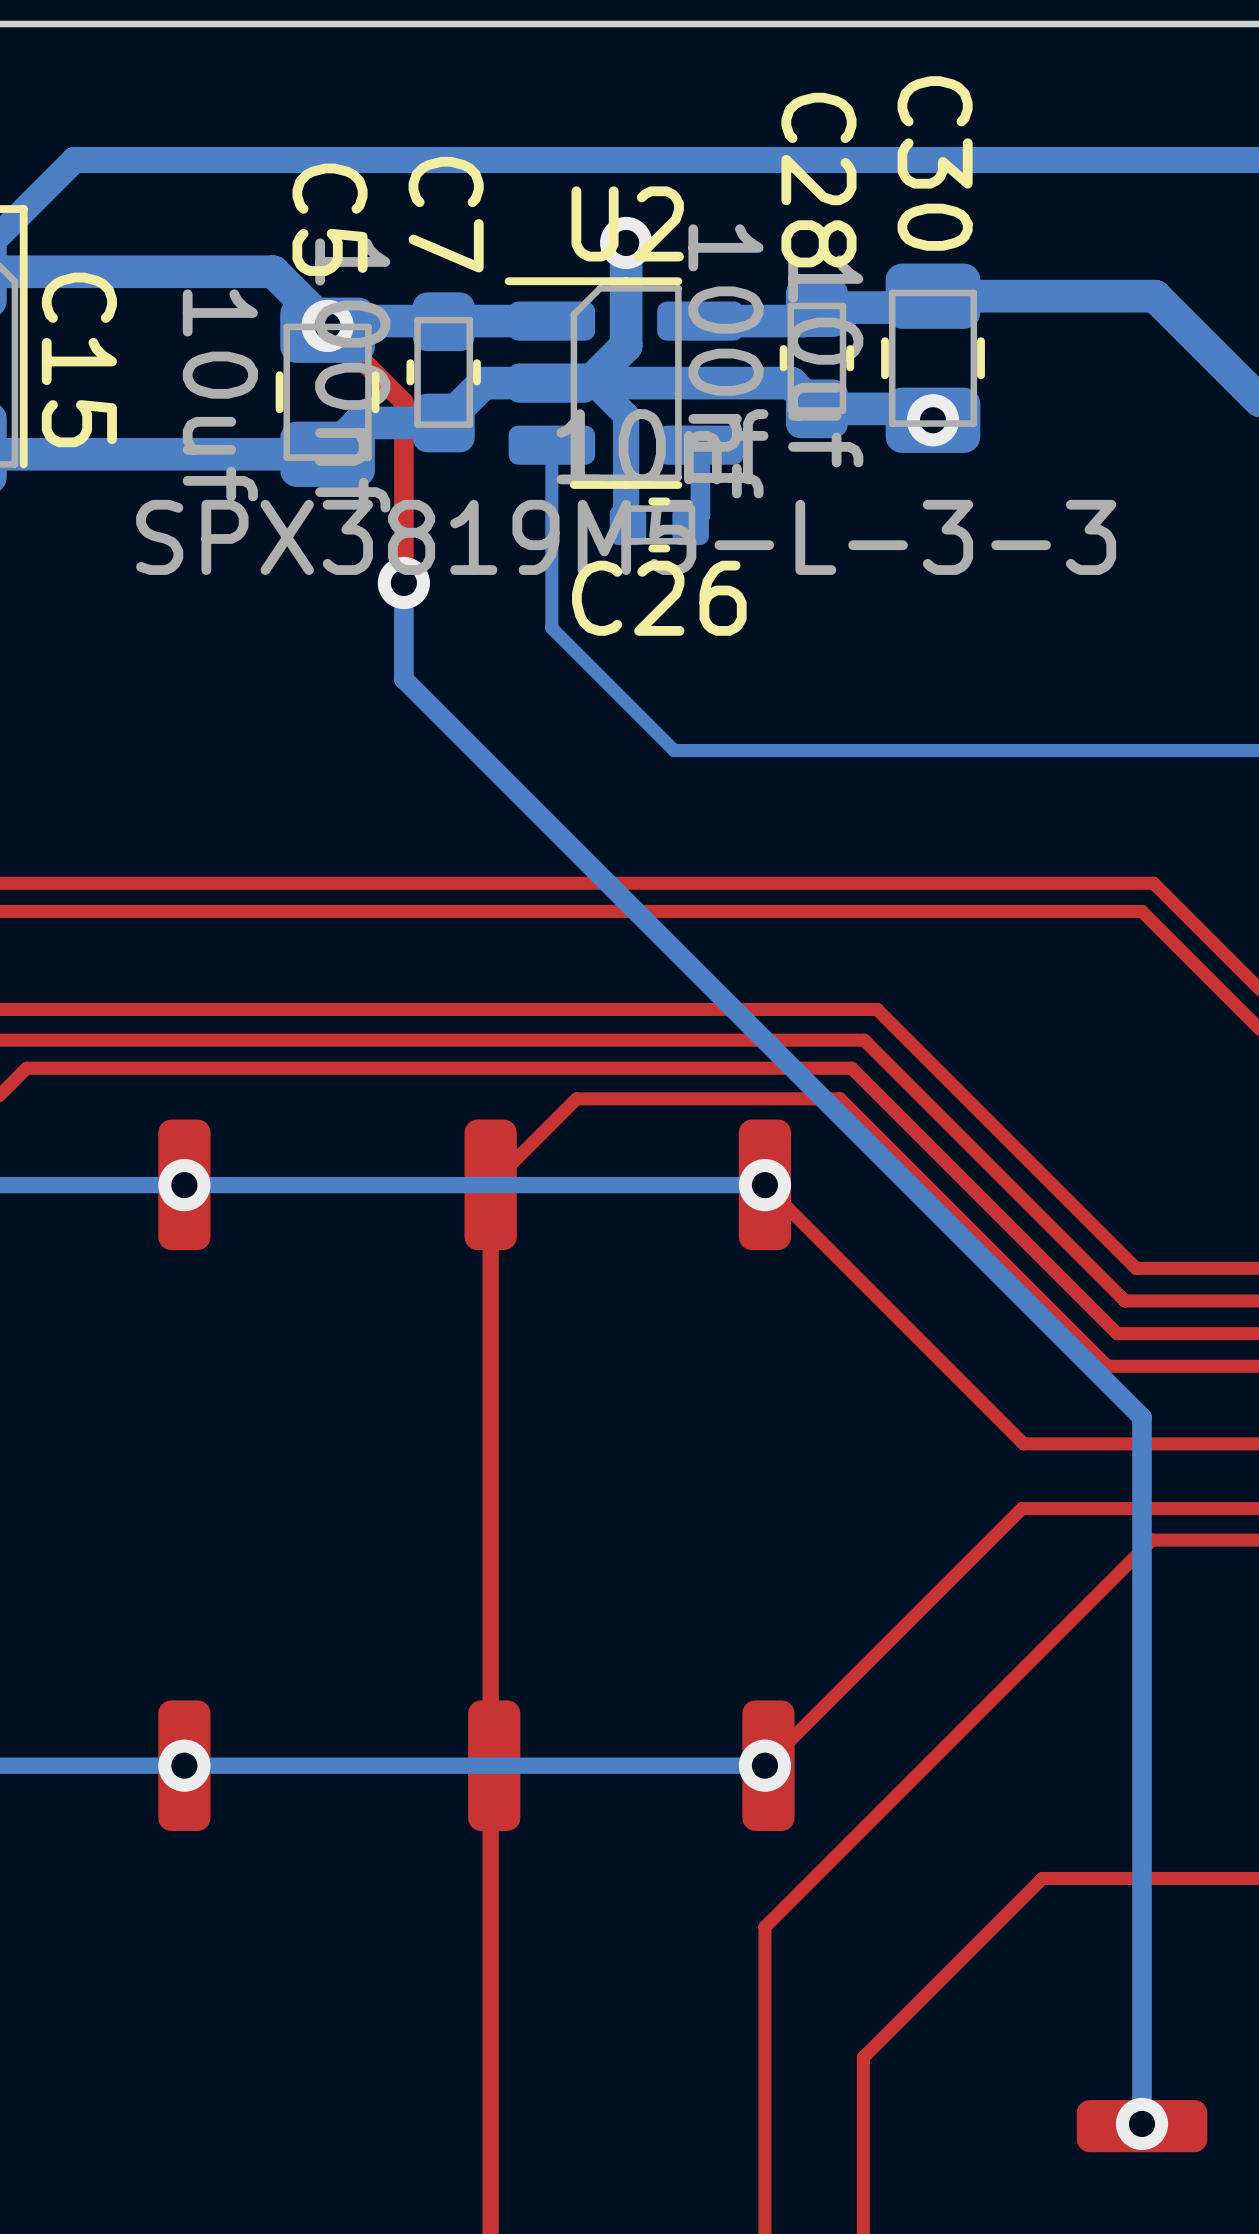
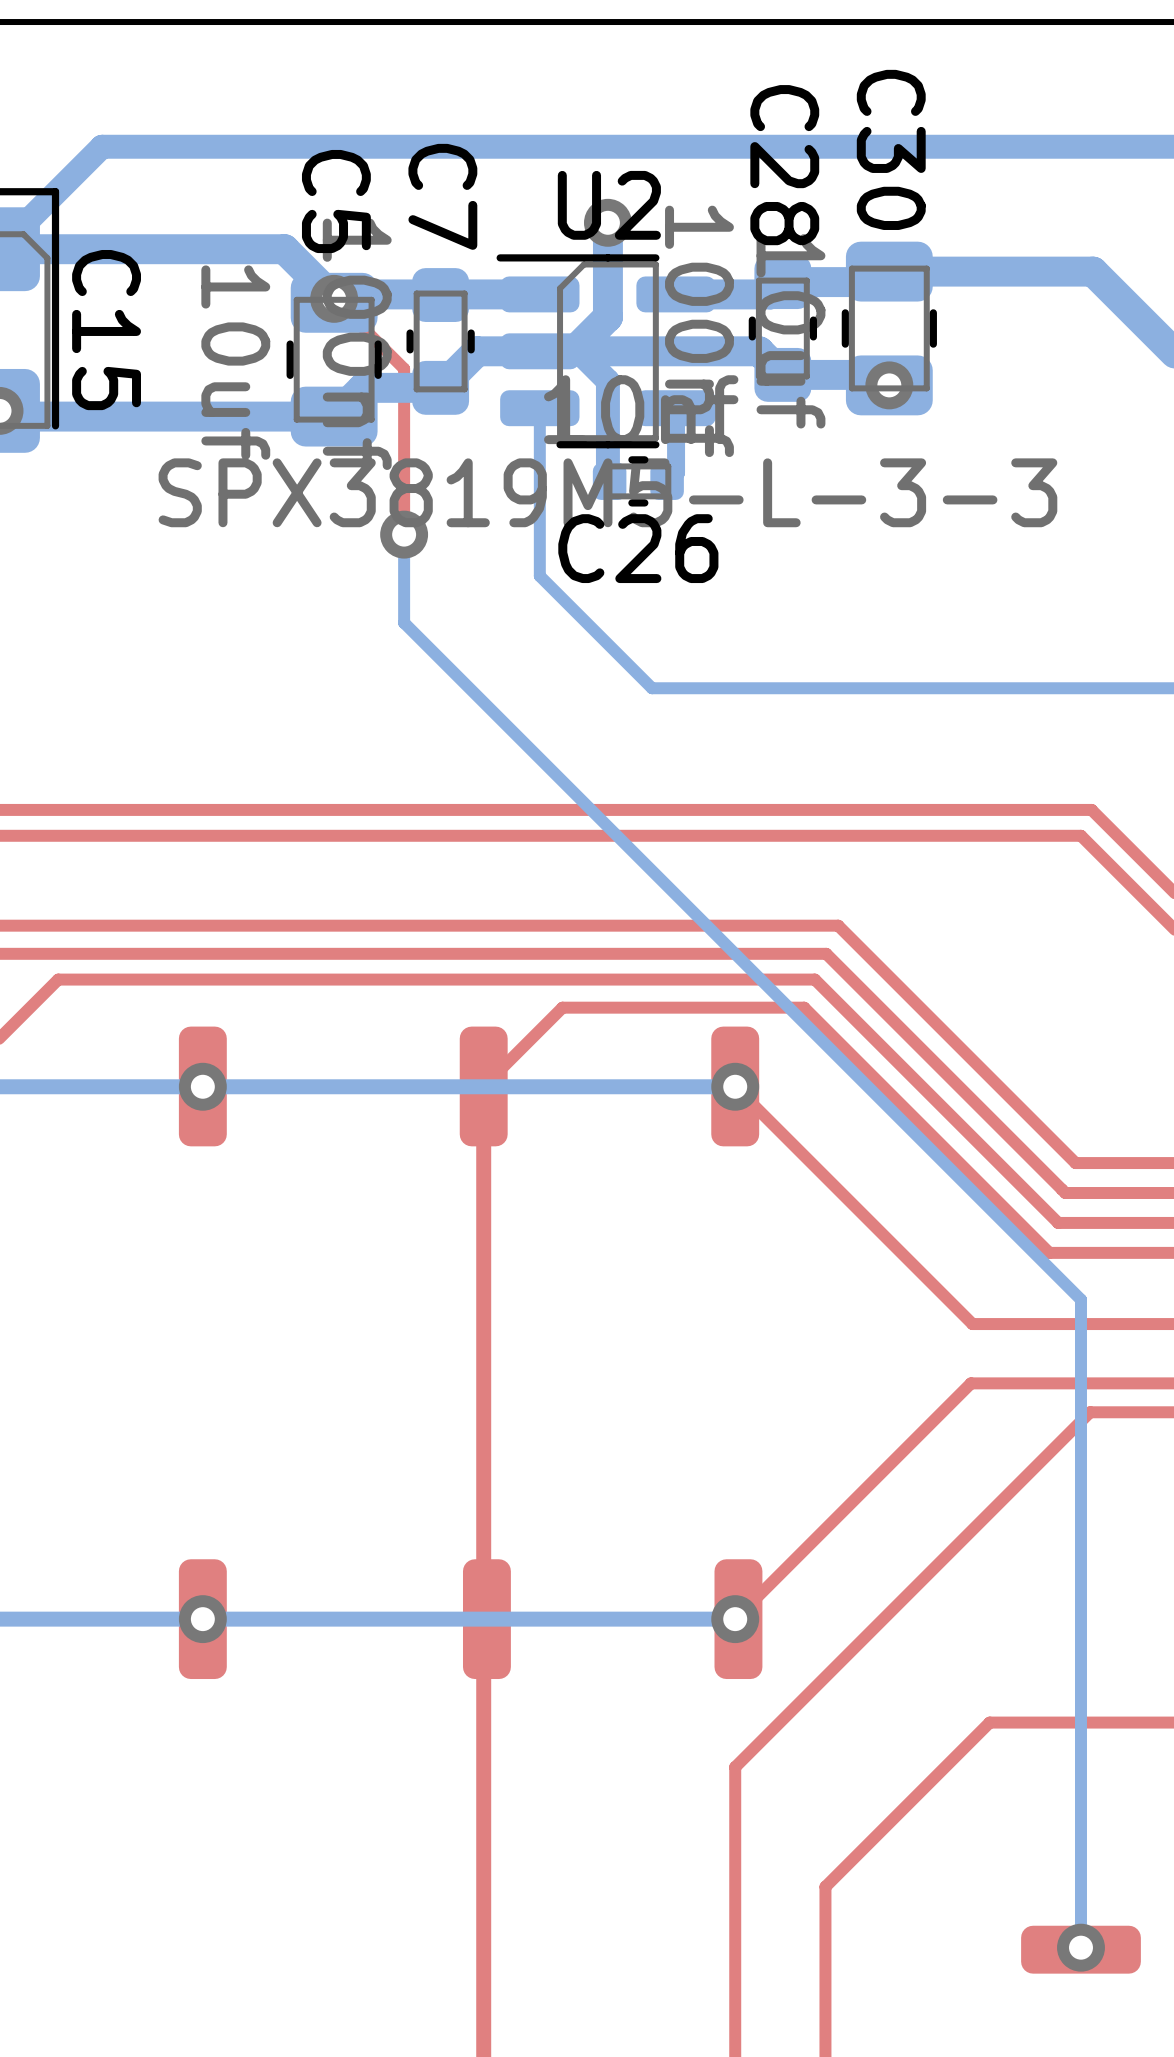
top track width: thick (327, 325) (403, 402) (403, 583) -> thin (334, 298) (404, 368) (404, 534)
bottom track width: thick (403, 583) (403, 679) (1142, 1417) (1142, 2123) -> thin (404, 534) (404, 622) (1080, 1299) (1080, 1947)

